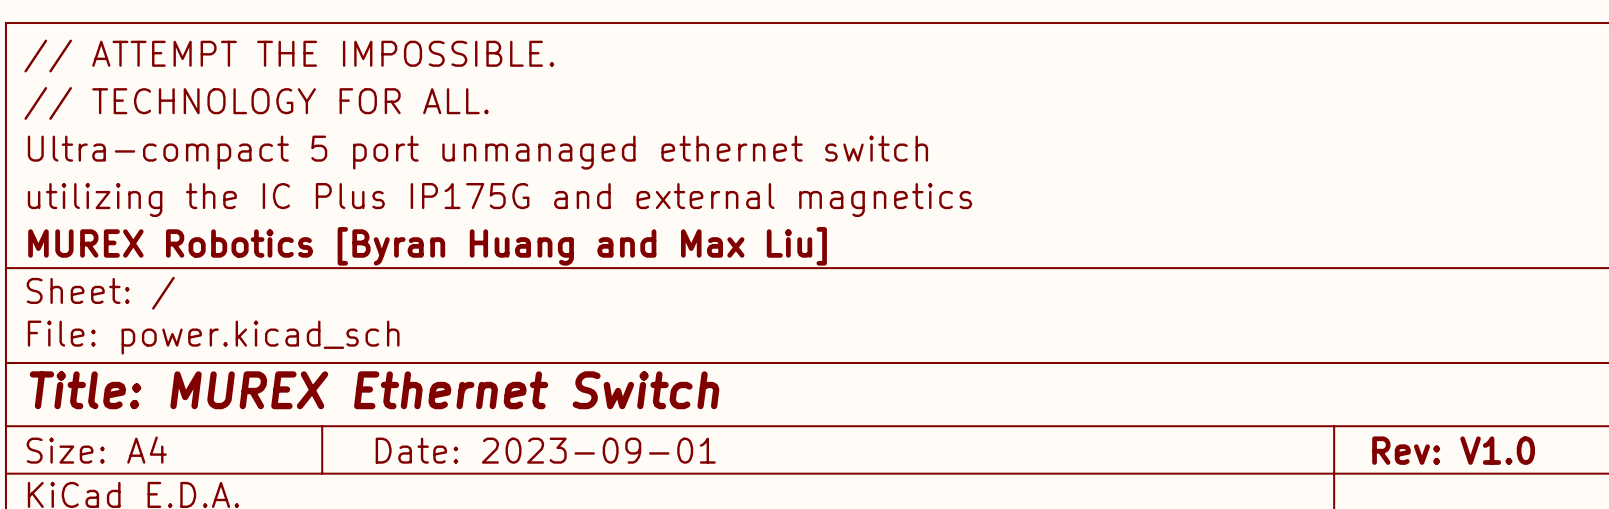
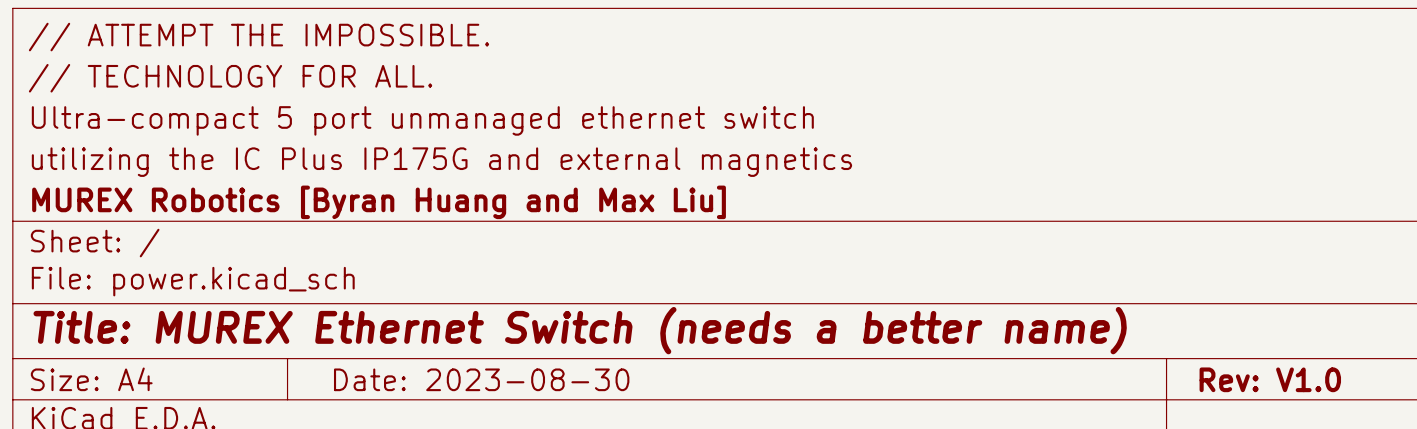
title block: Title: MUREX Ethernet Switch (374, 390) -> Title: MUREX Ethernet Switch (needs a better name) (580, 330)
title block: Date: 2023-09-01 (545, 450) -> Date: 2023-08-30 (481, 379)

